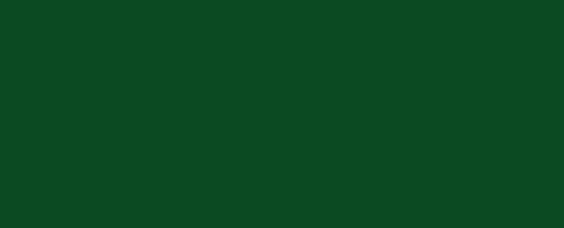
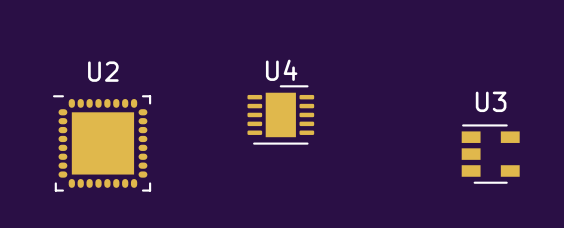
U4: none -> (280, 114)
U2: none -> (102, 143)
U3: none -> (490, 154)

